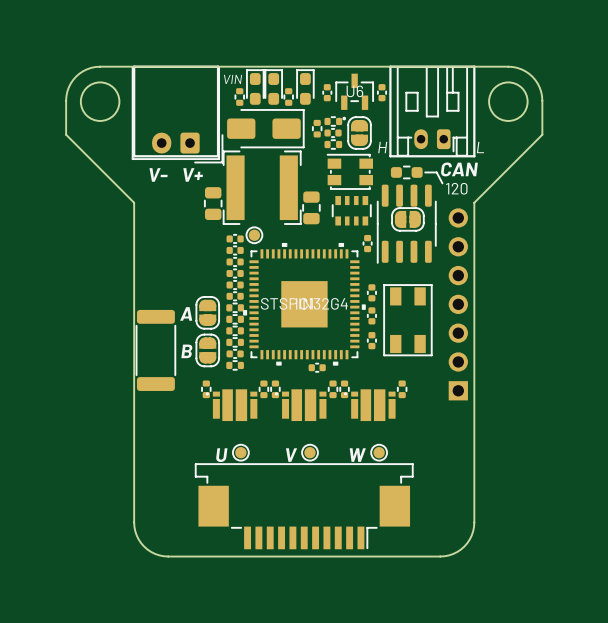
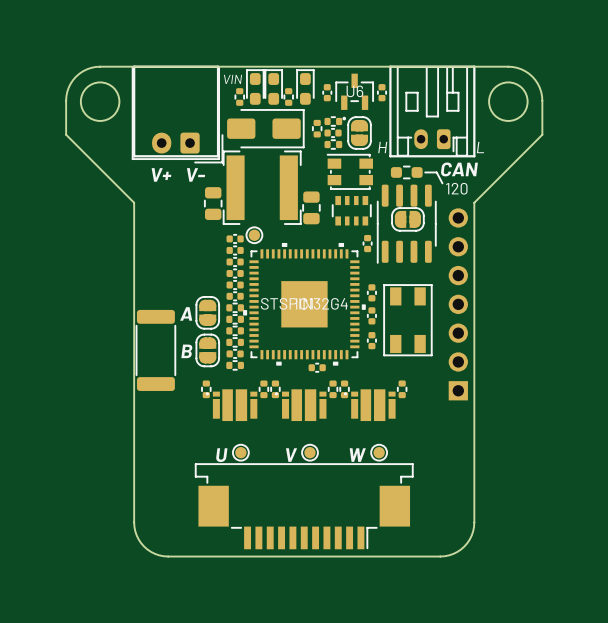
text: V- (158, 174) -> V+ (161, 174)
text: V+ (193, 174) -> V- (196, 174)

